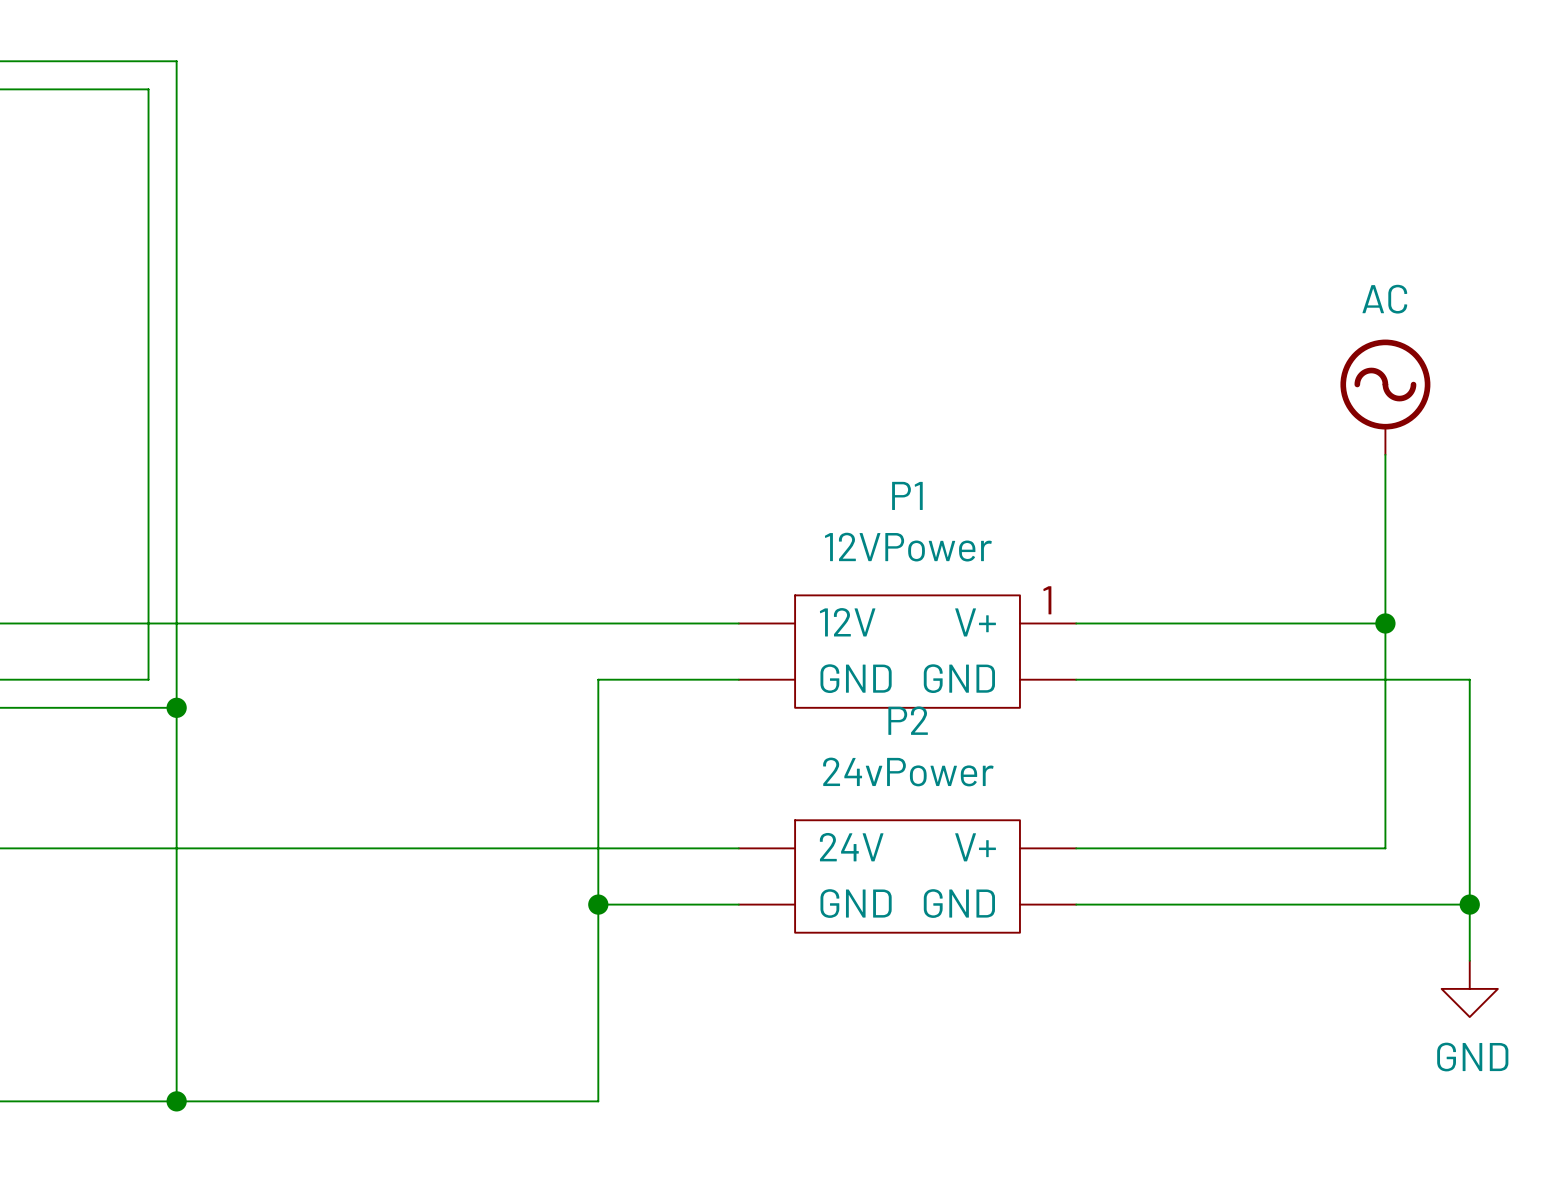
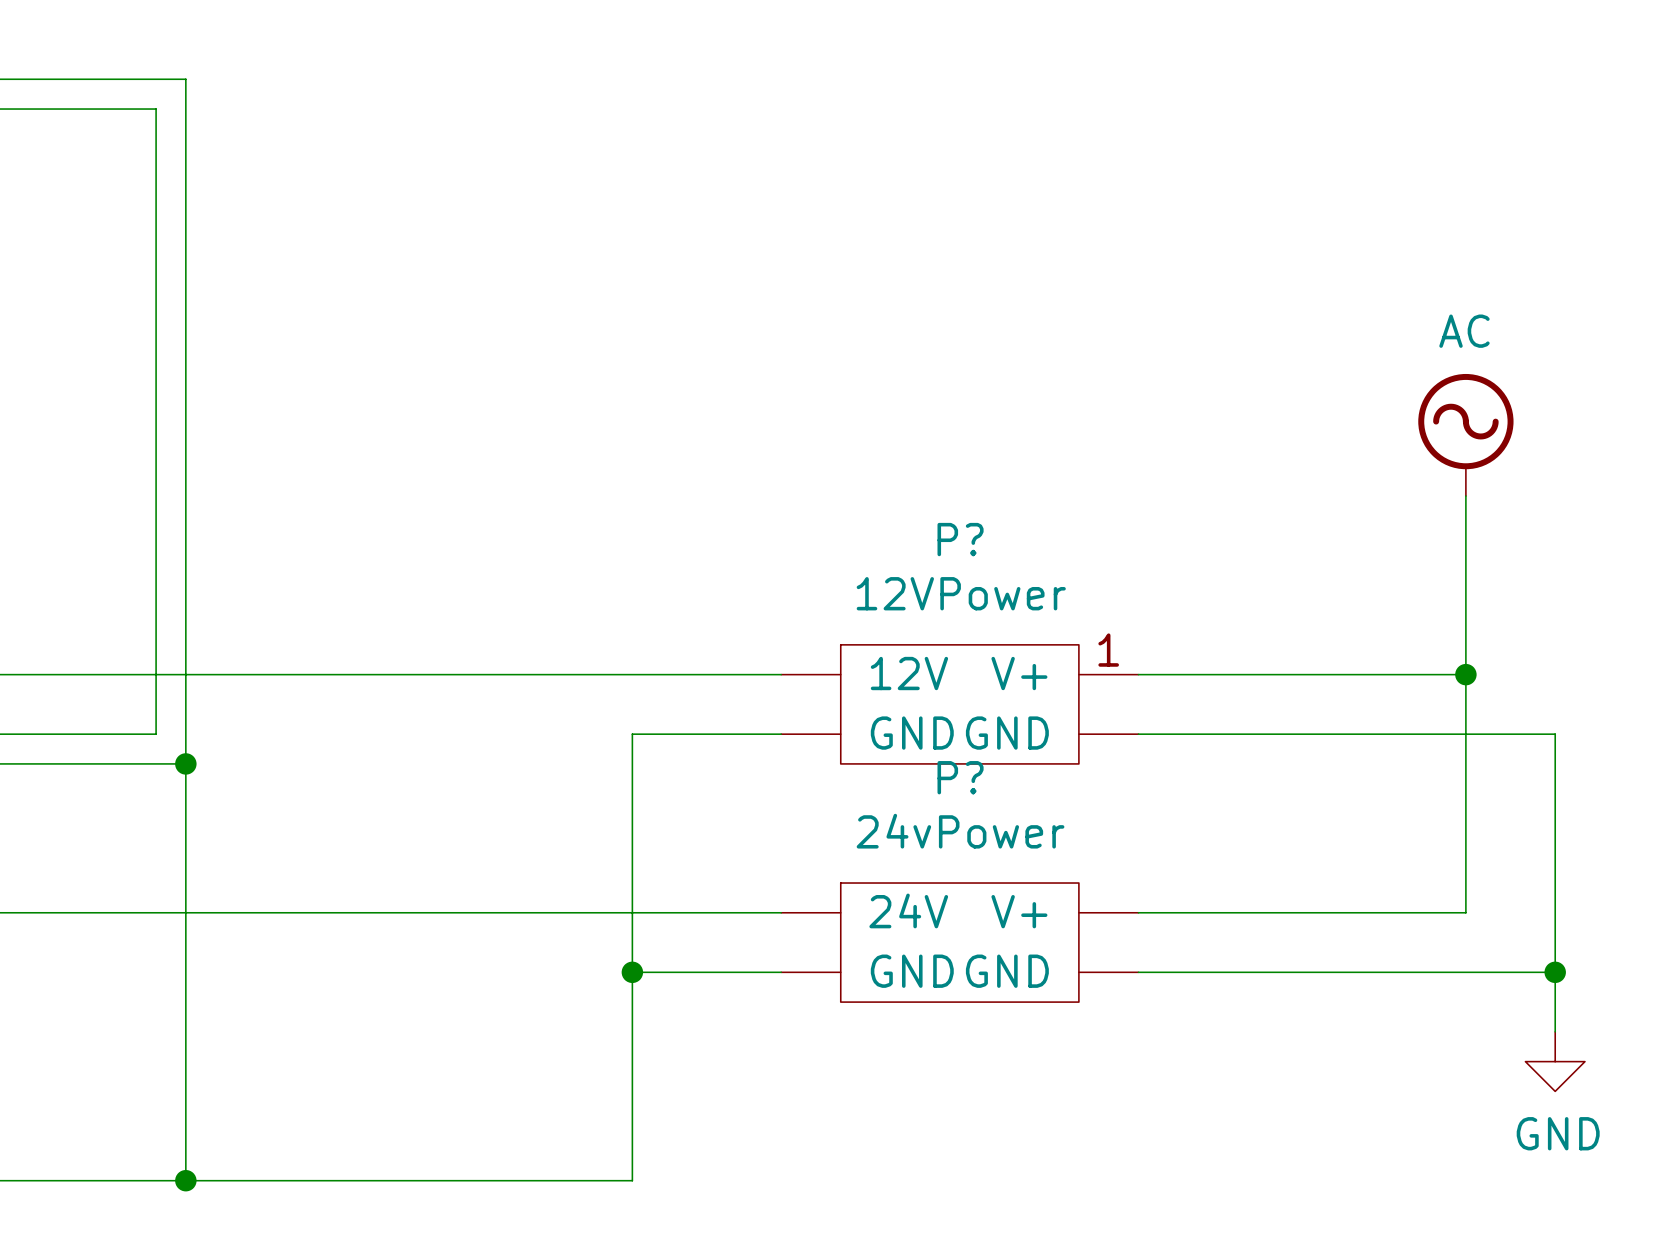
P1 name: P1 (907, 495) -> P? (960, 539)
P2 name: P2 (908, 720) -> P? (960, 777)

